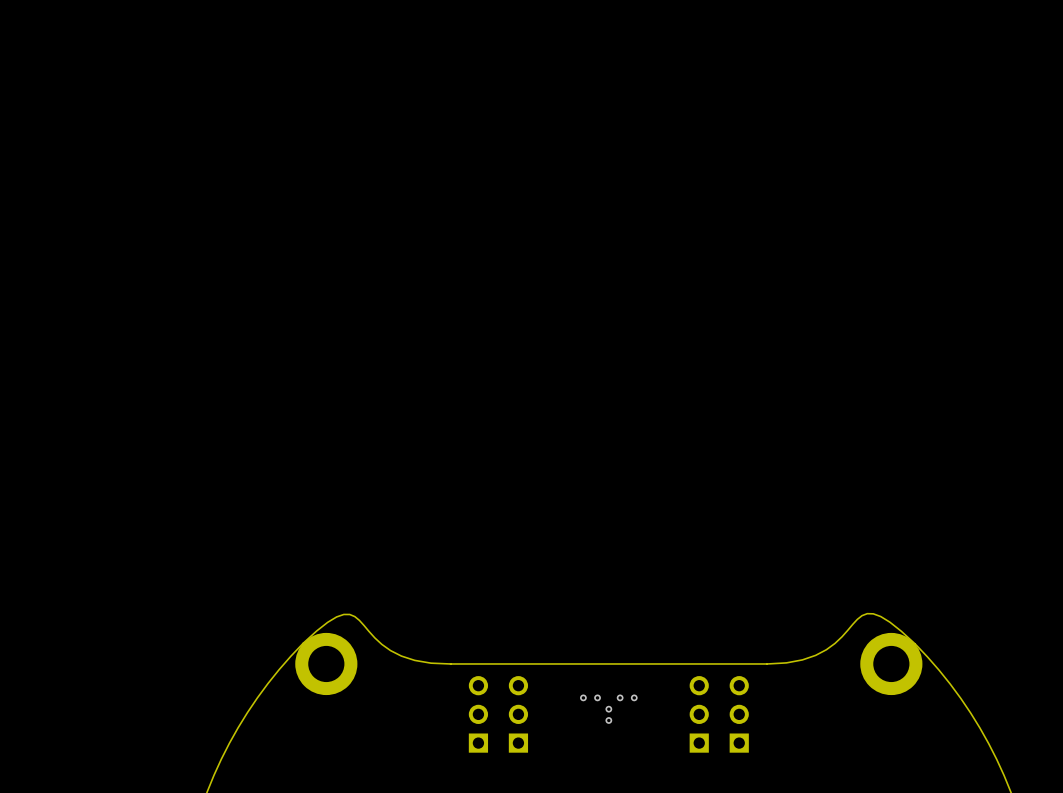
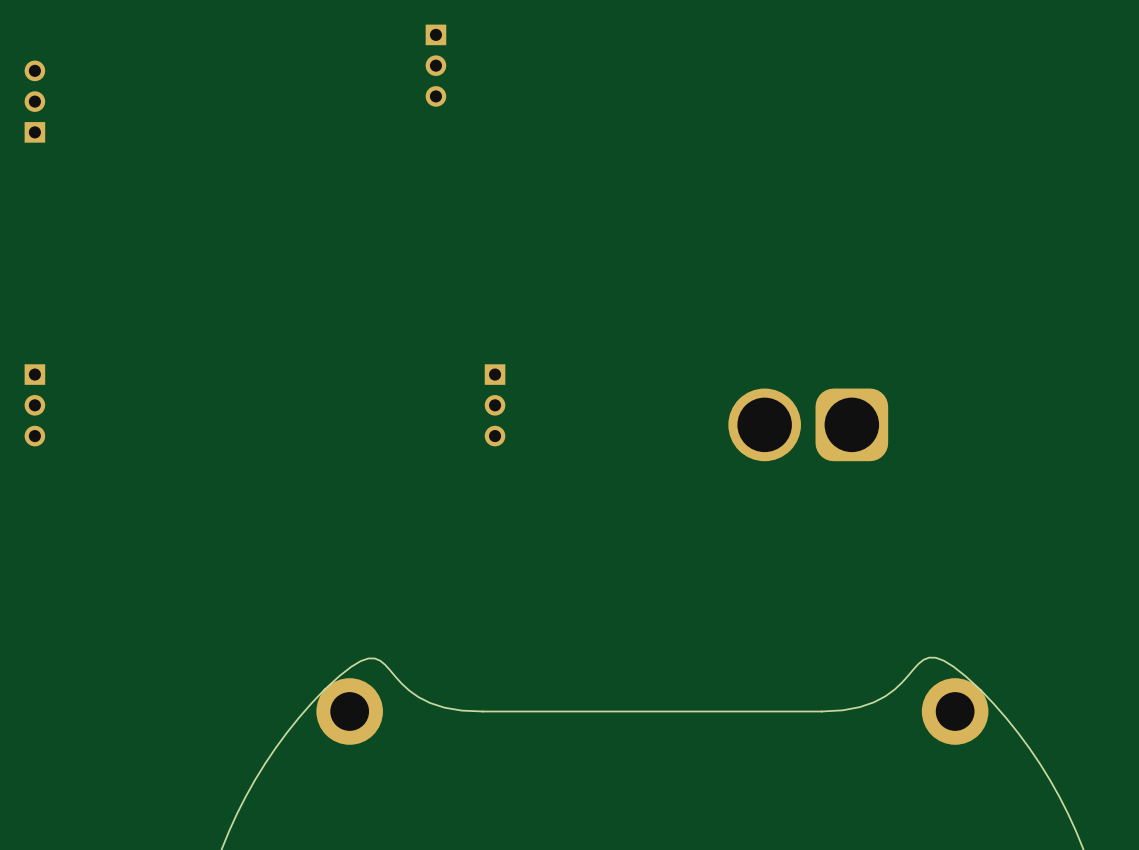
part: none -> (435, 65)
part: none -> (34, 101)
part: none -> (34, 405)
part: none -> (495, 405)
part: none -> (808, 424)
via: (583, 697) -> none
via: (597, 697) -> none
via: (620, 697) -> none
via: (634, 697) -> none
via: (608, 709) -> none
part: (478, 714) -> none
part: (518, 714) -> none
part: (699, 714) -> none
part: (739, 714) -> none
via: (608, 720) -> none

